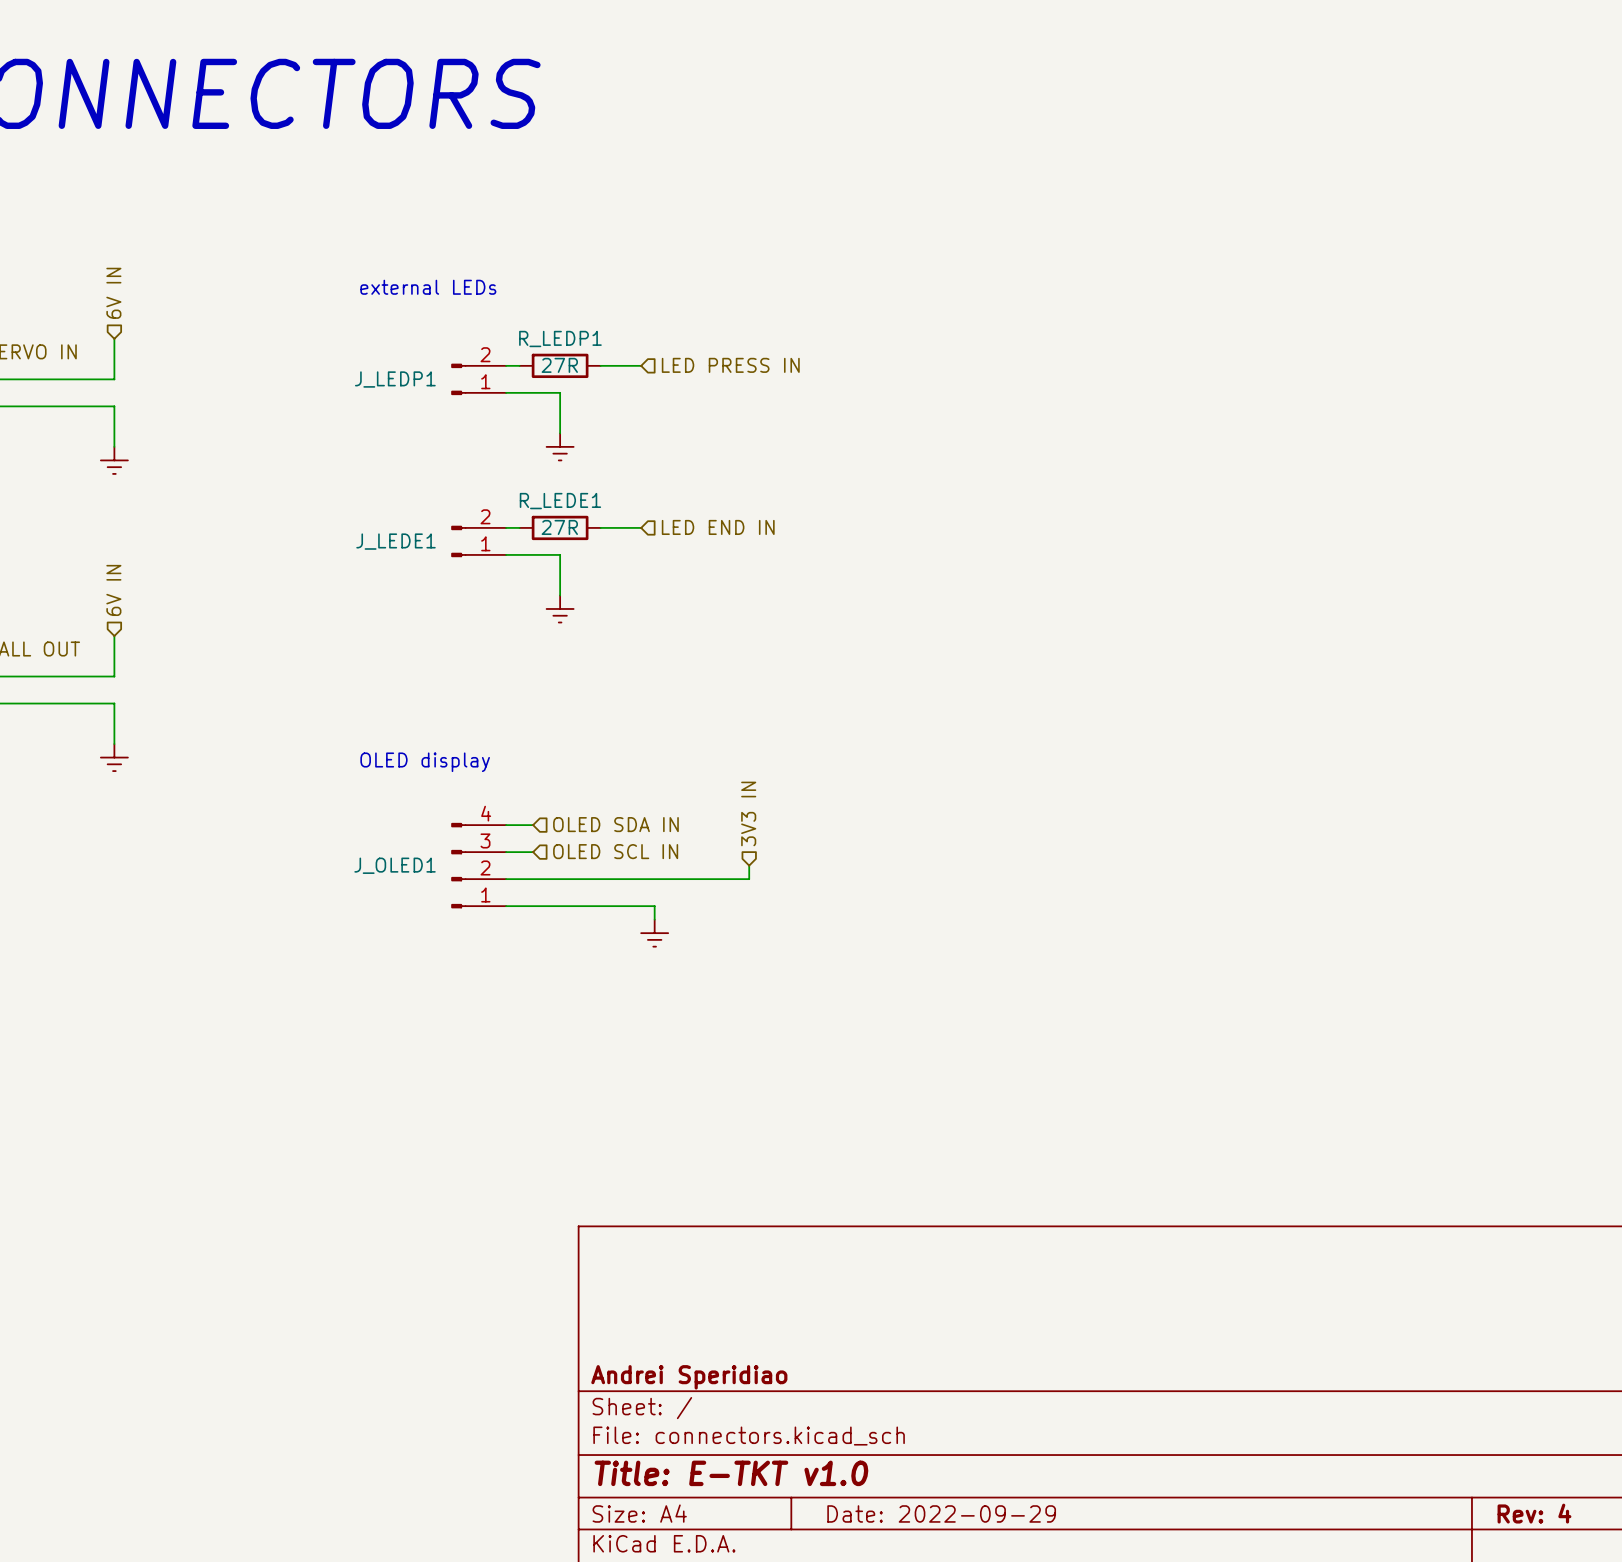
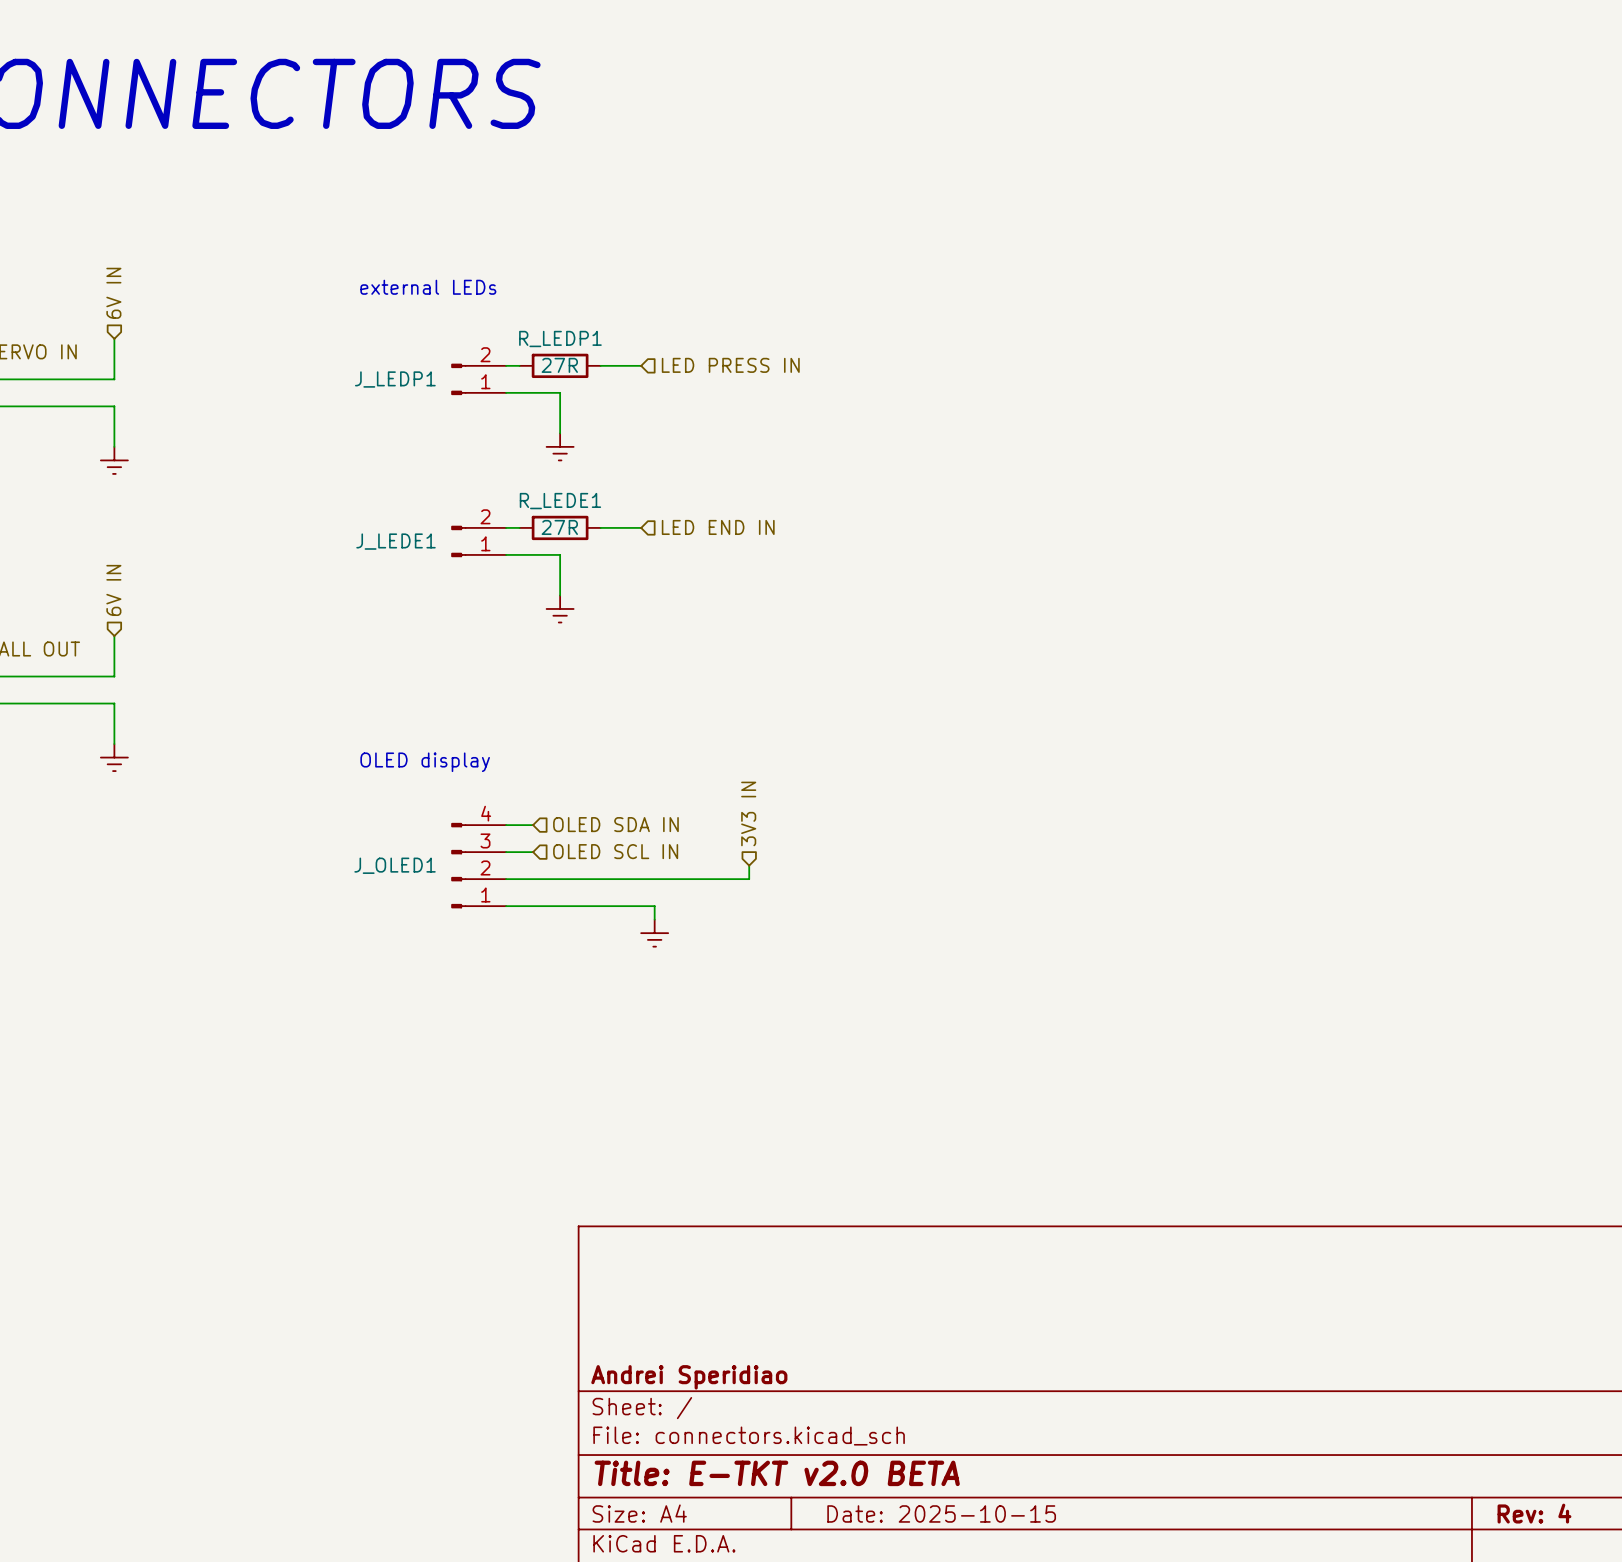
title block: Title: E-TKT v1.0 (731, 1473) -> Title: E-TKT v2.0 BETA (777, 1473)
title block: Date: 2022-09-29 (941, 1513) -> Date: 2025-10-15 (941, 1513)

